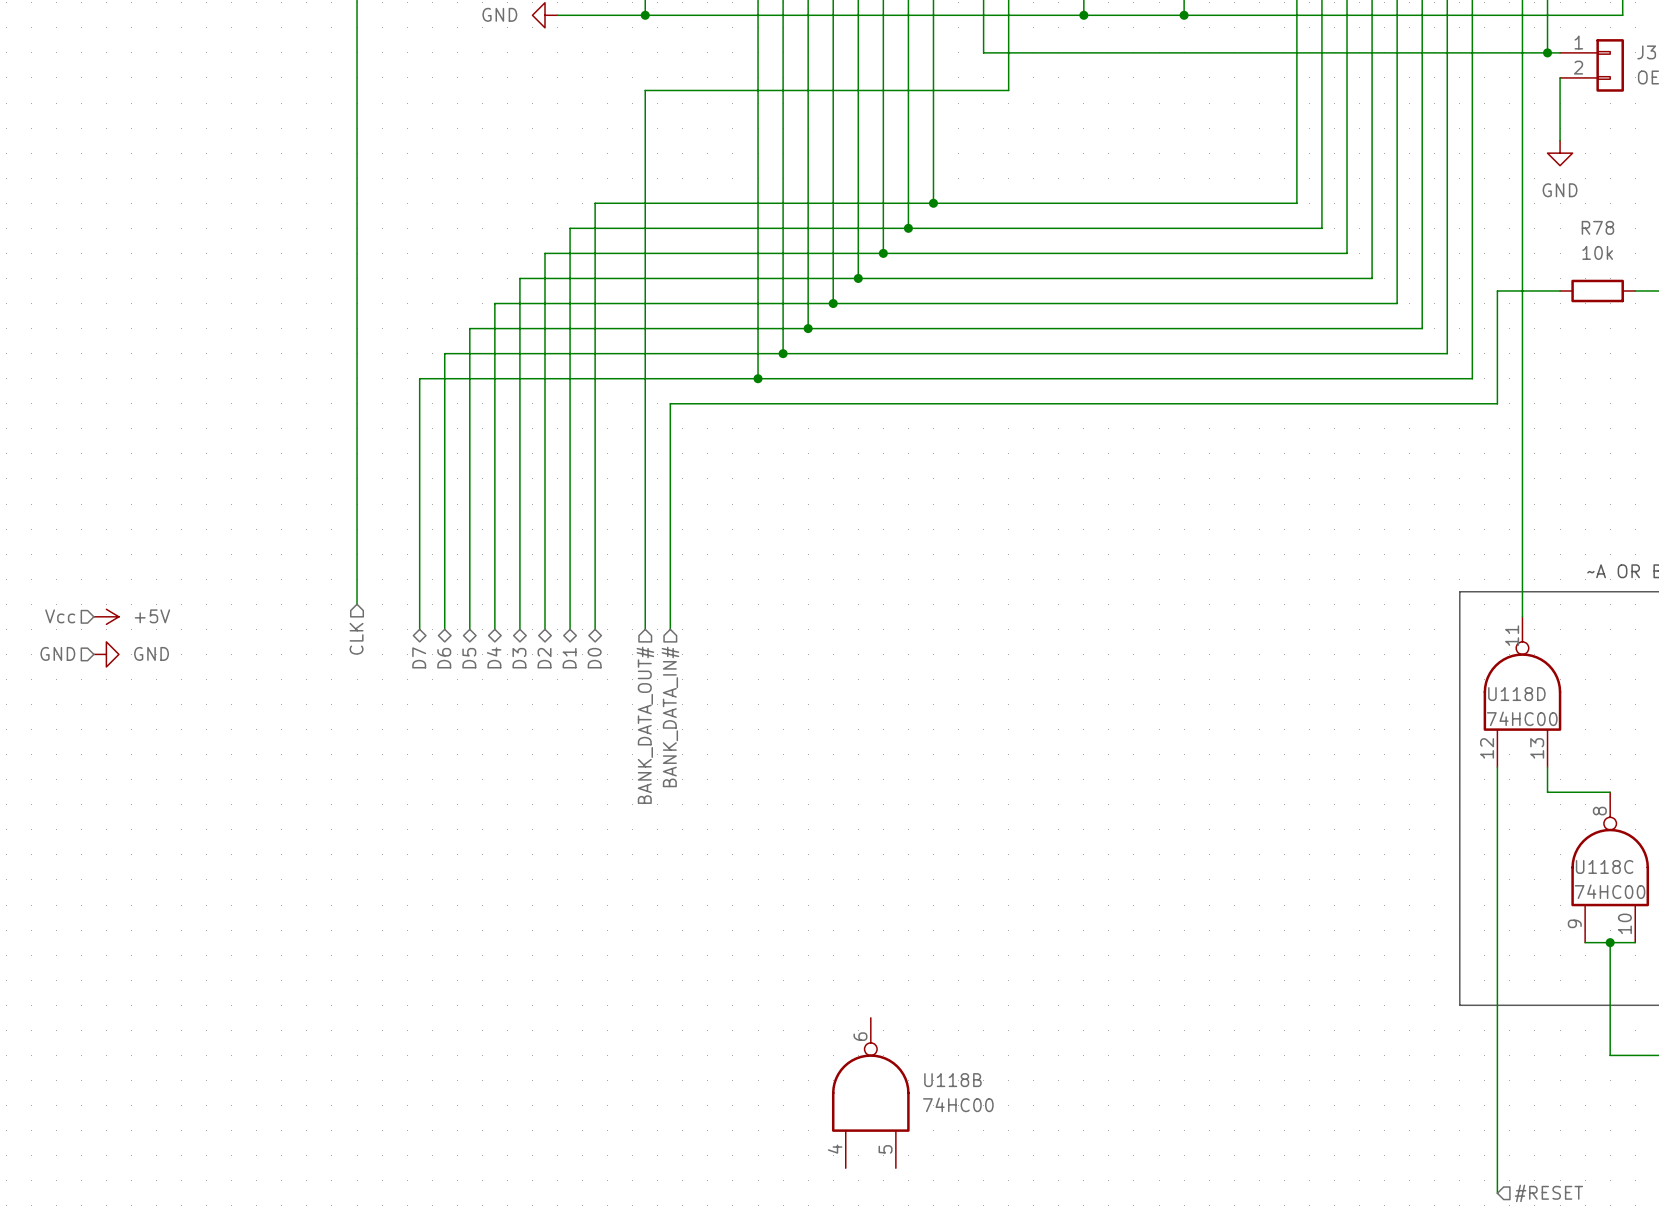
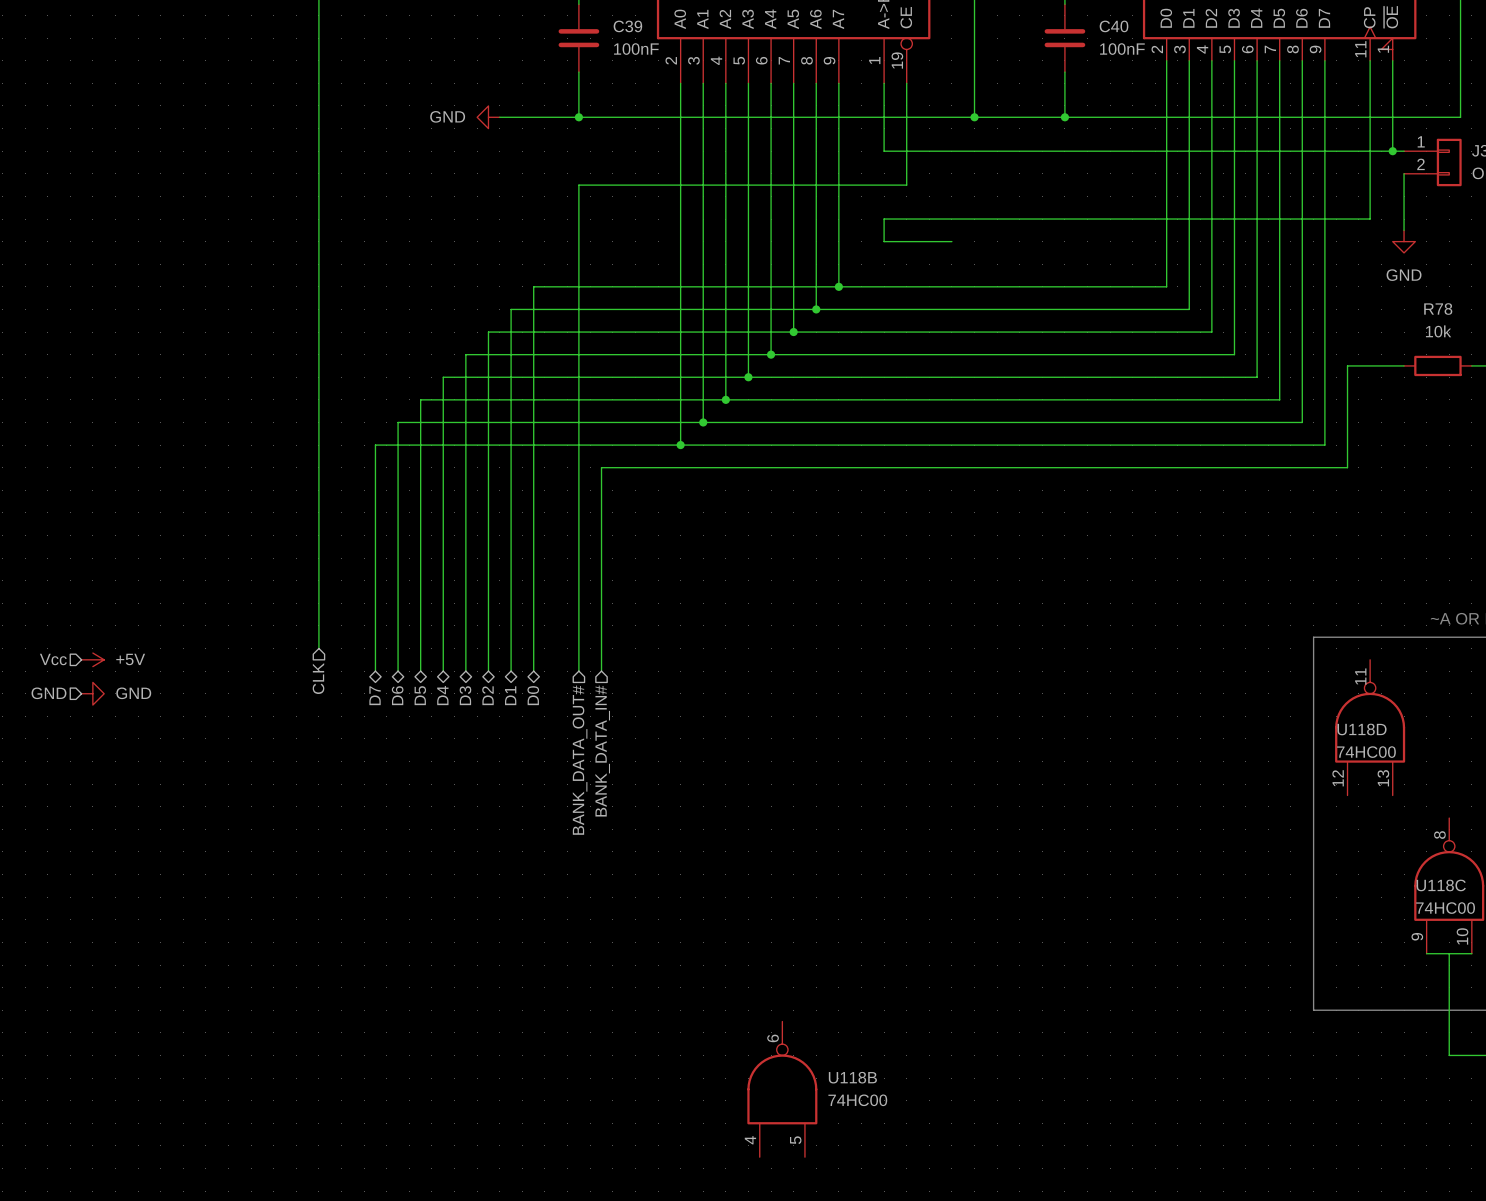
wire: (1522, 128) (1522, 616) -> (1370, 219) (884, 219) (884, 241) (951, 241)
wire: (1497, 767) (1497, 1193) -> none
wire: (1547, 767) (1547, 792) (1610, 792) -> none
junction: (1610, 942) -> none
hierarchical label: #RESET (1548, 1193) -> none

